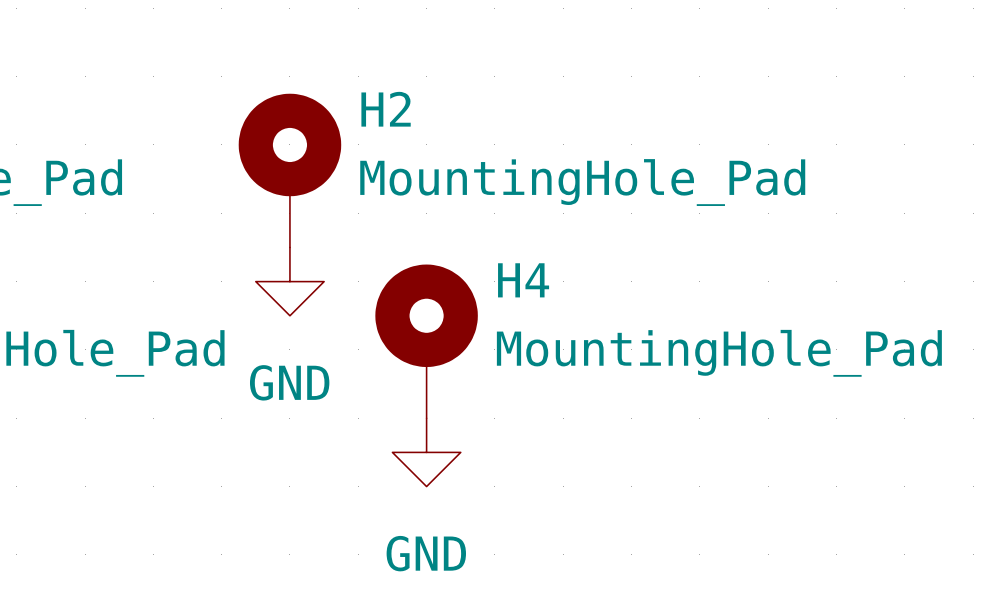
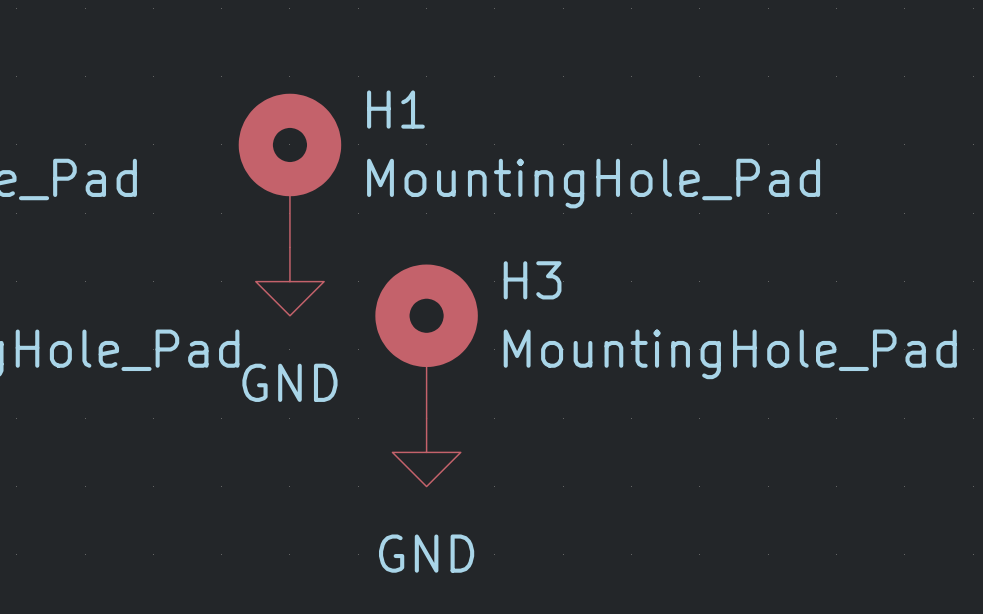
H2 name: H2 (386, 109) -> H1 (395, 109)
H4 name: H4 (523, 280) -> H3 (532, 280)

